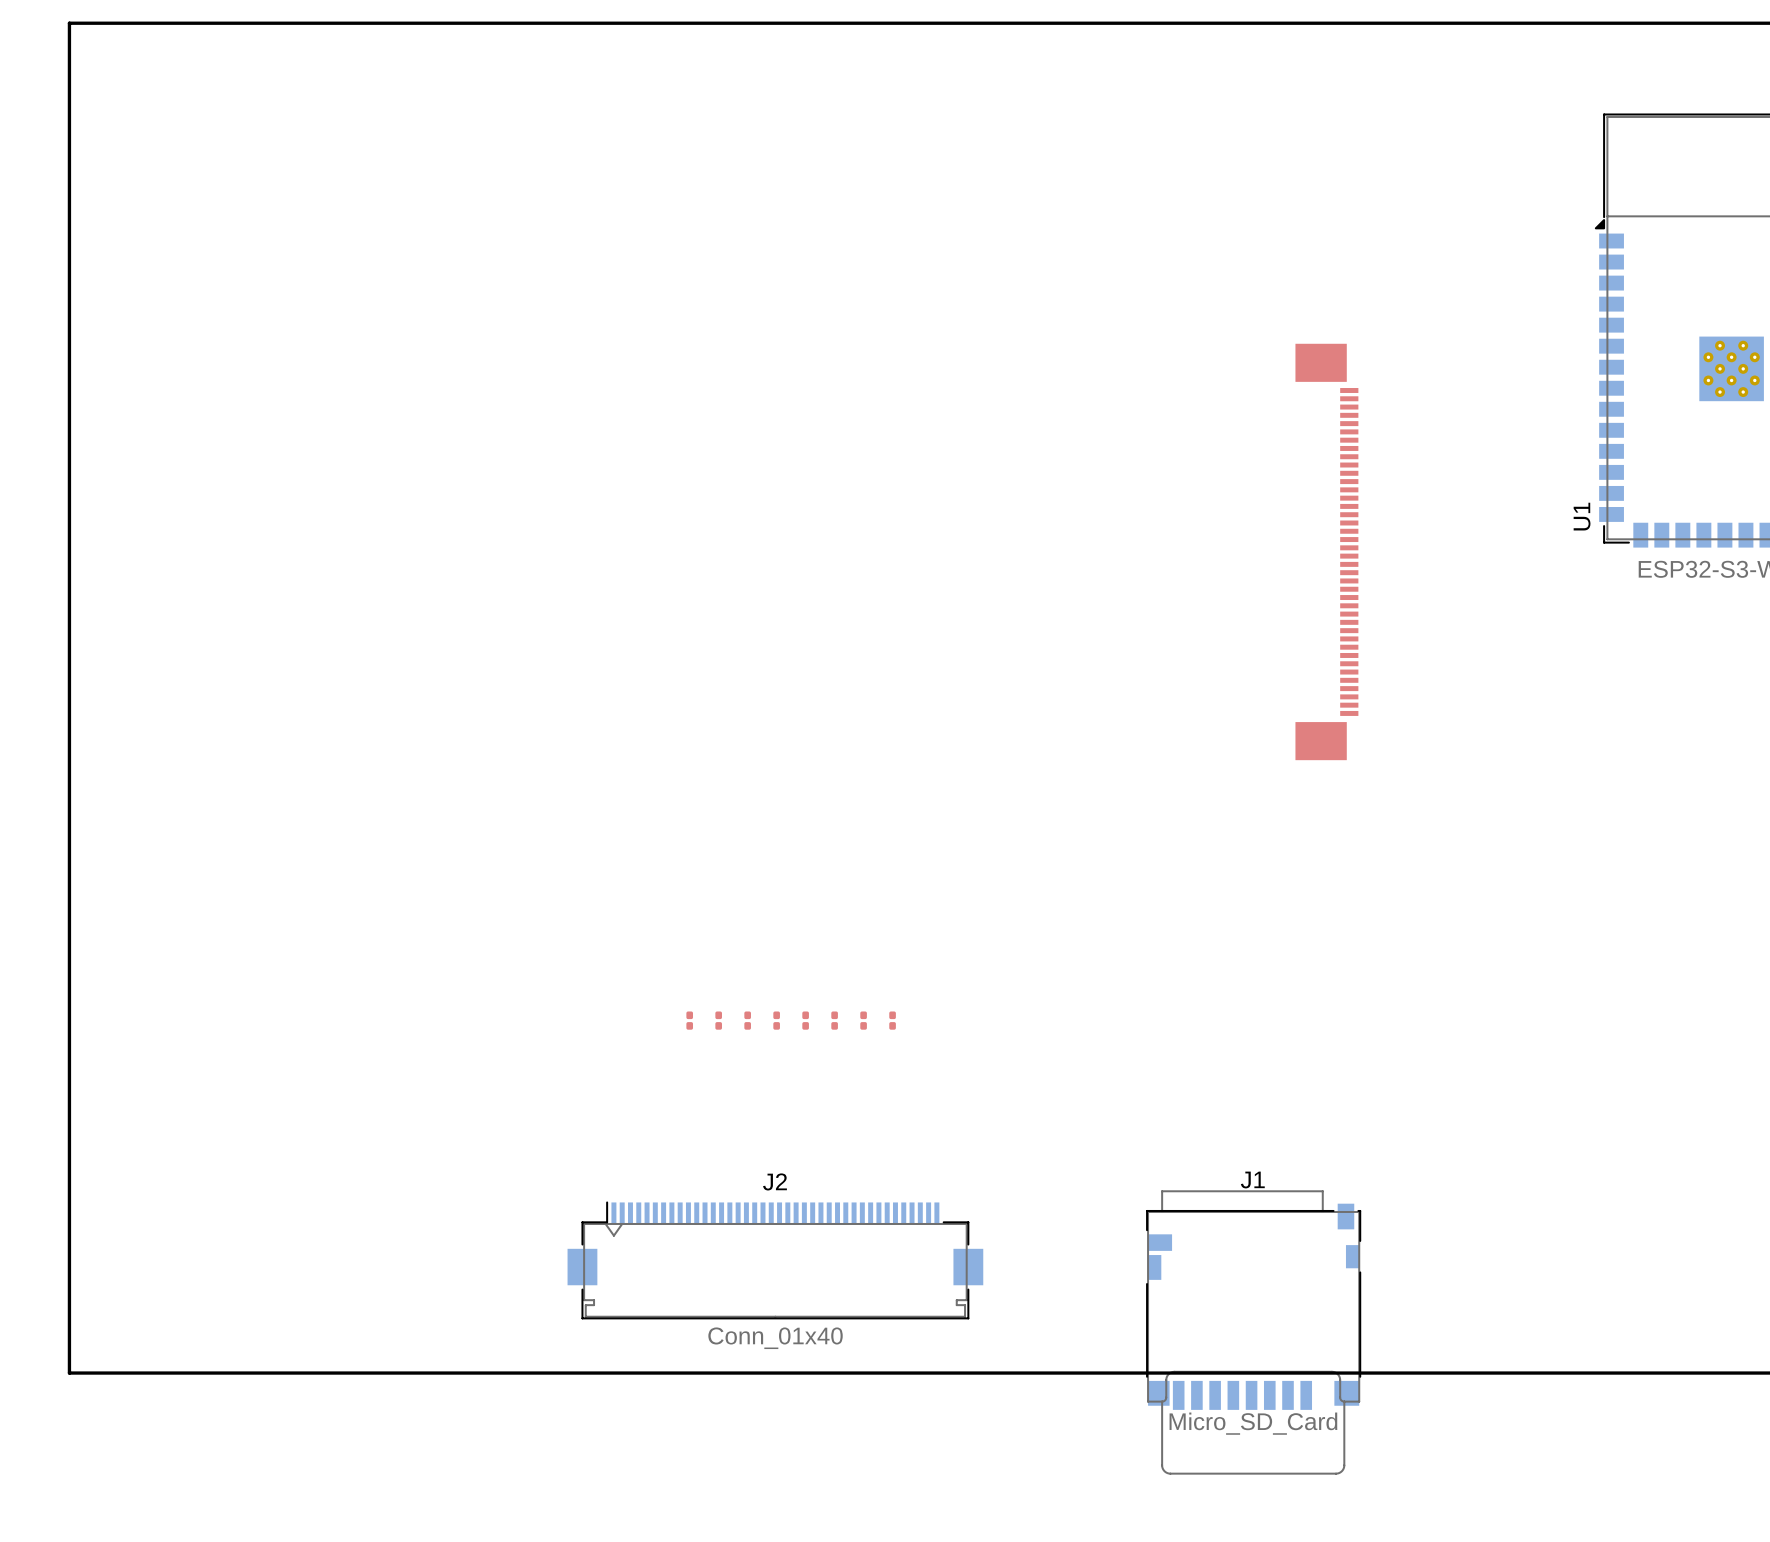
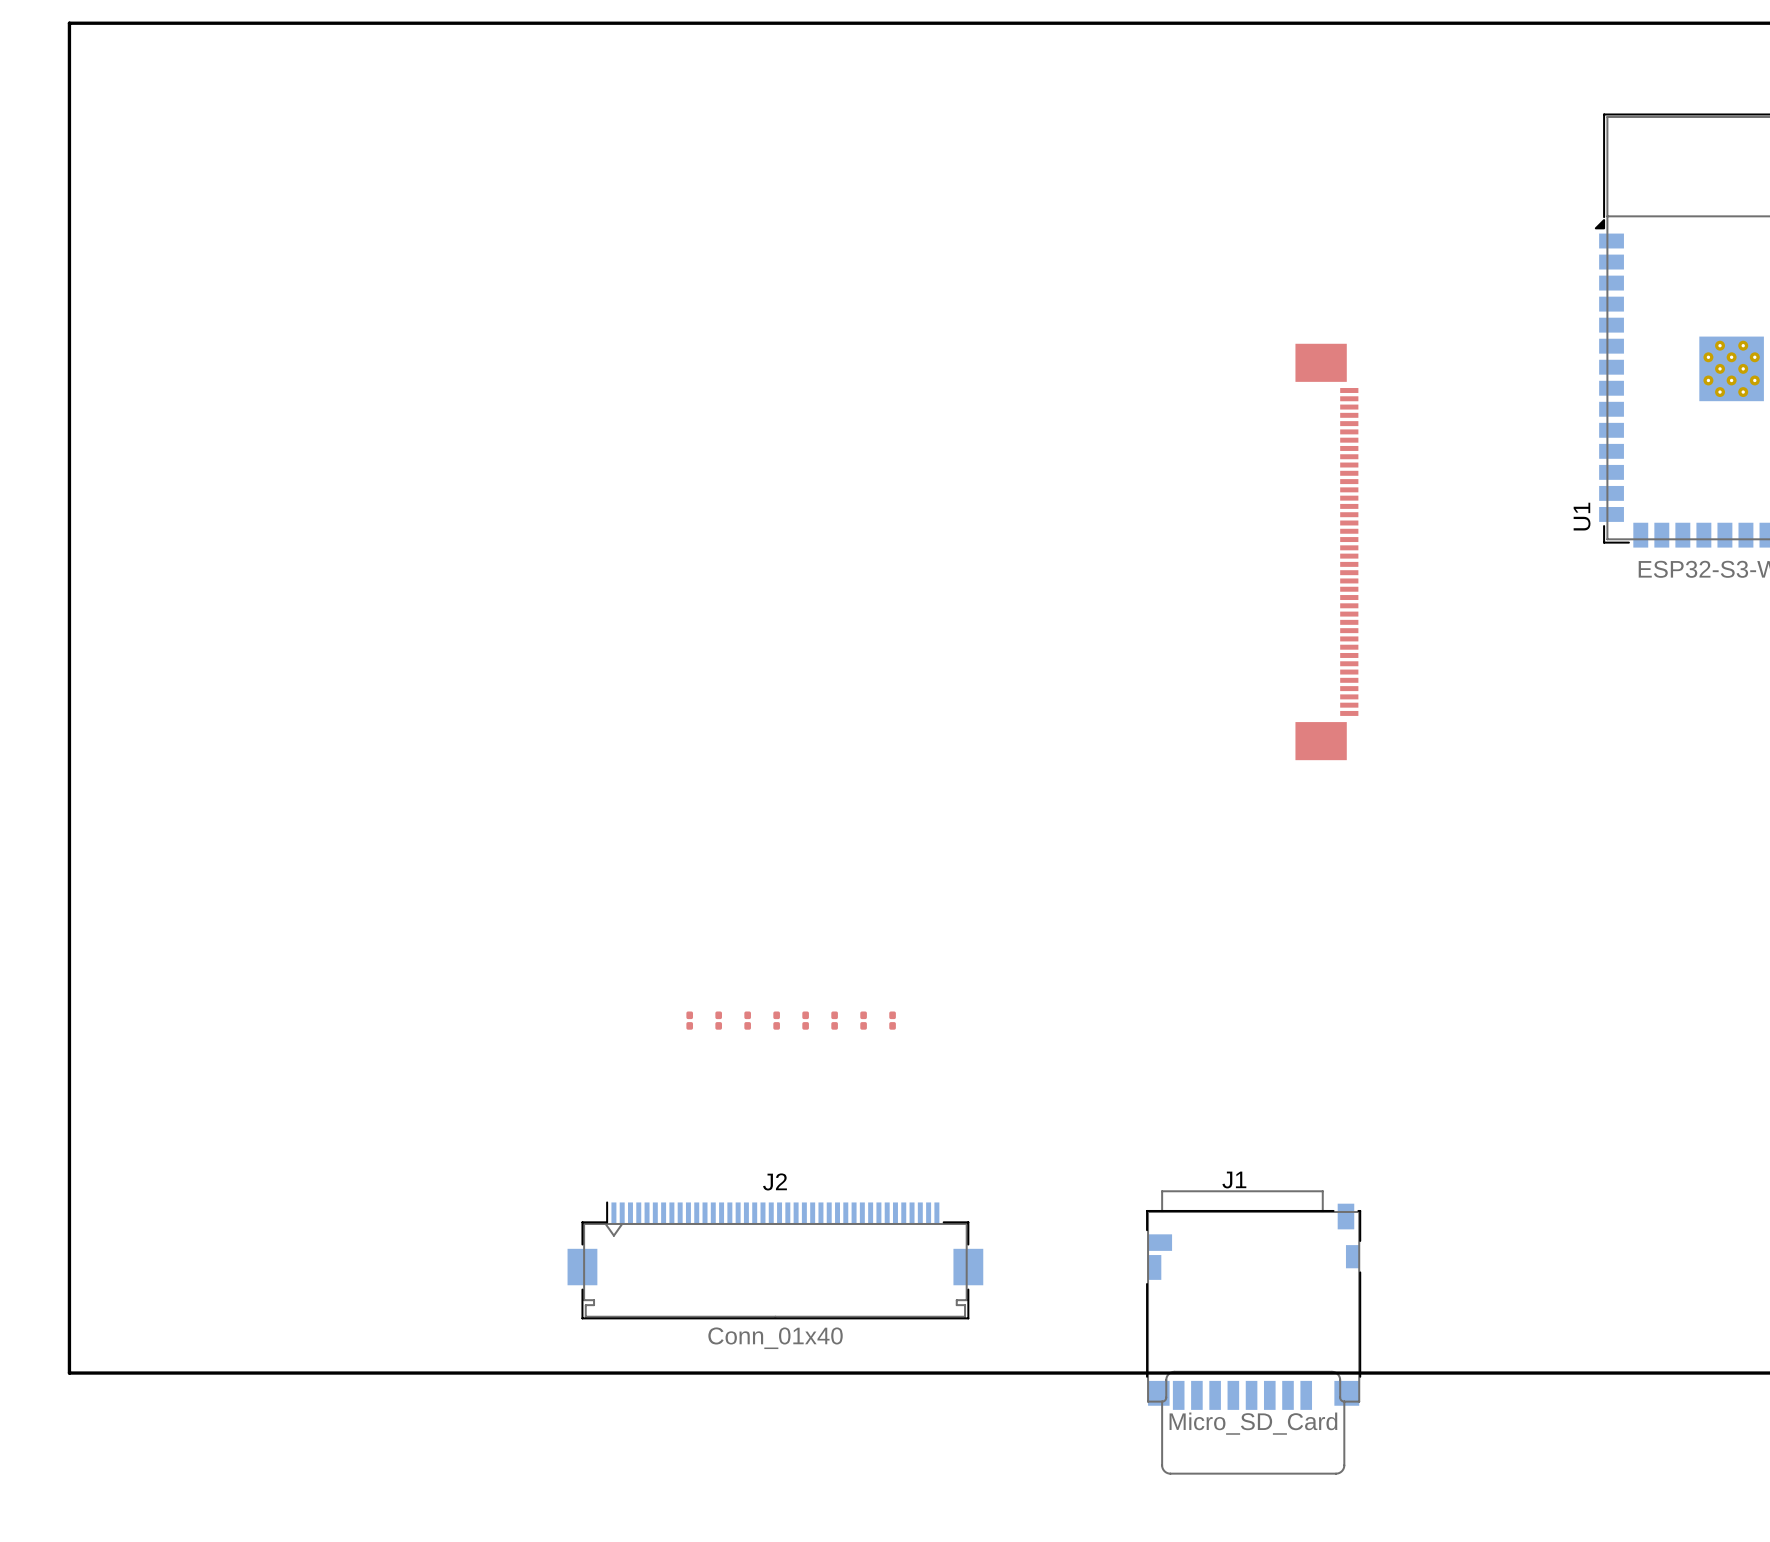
J1 name position: J1 (1252, 1180) -> J1 (1234, 1180)

